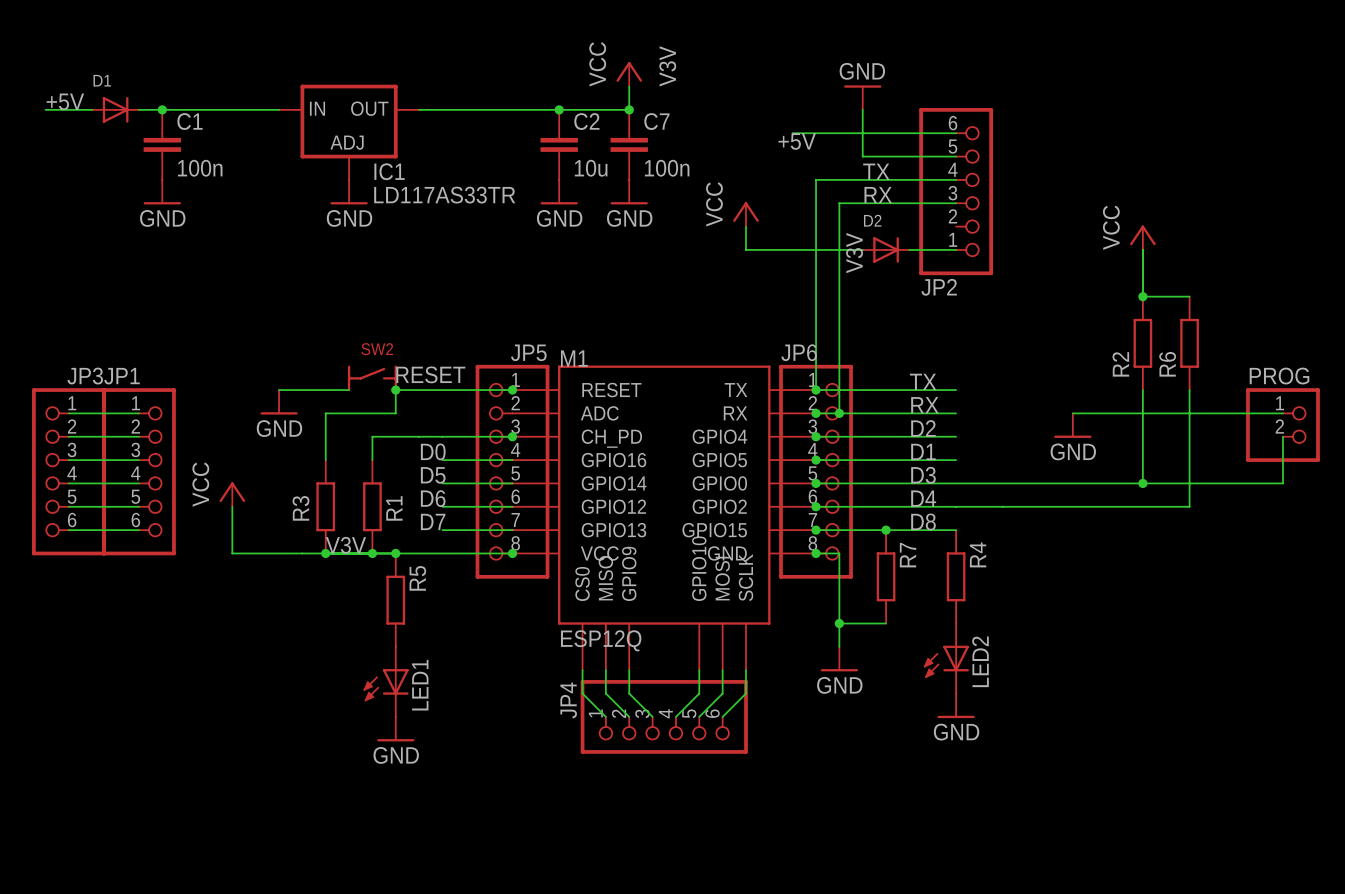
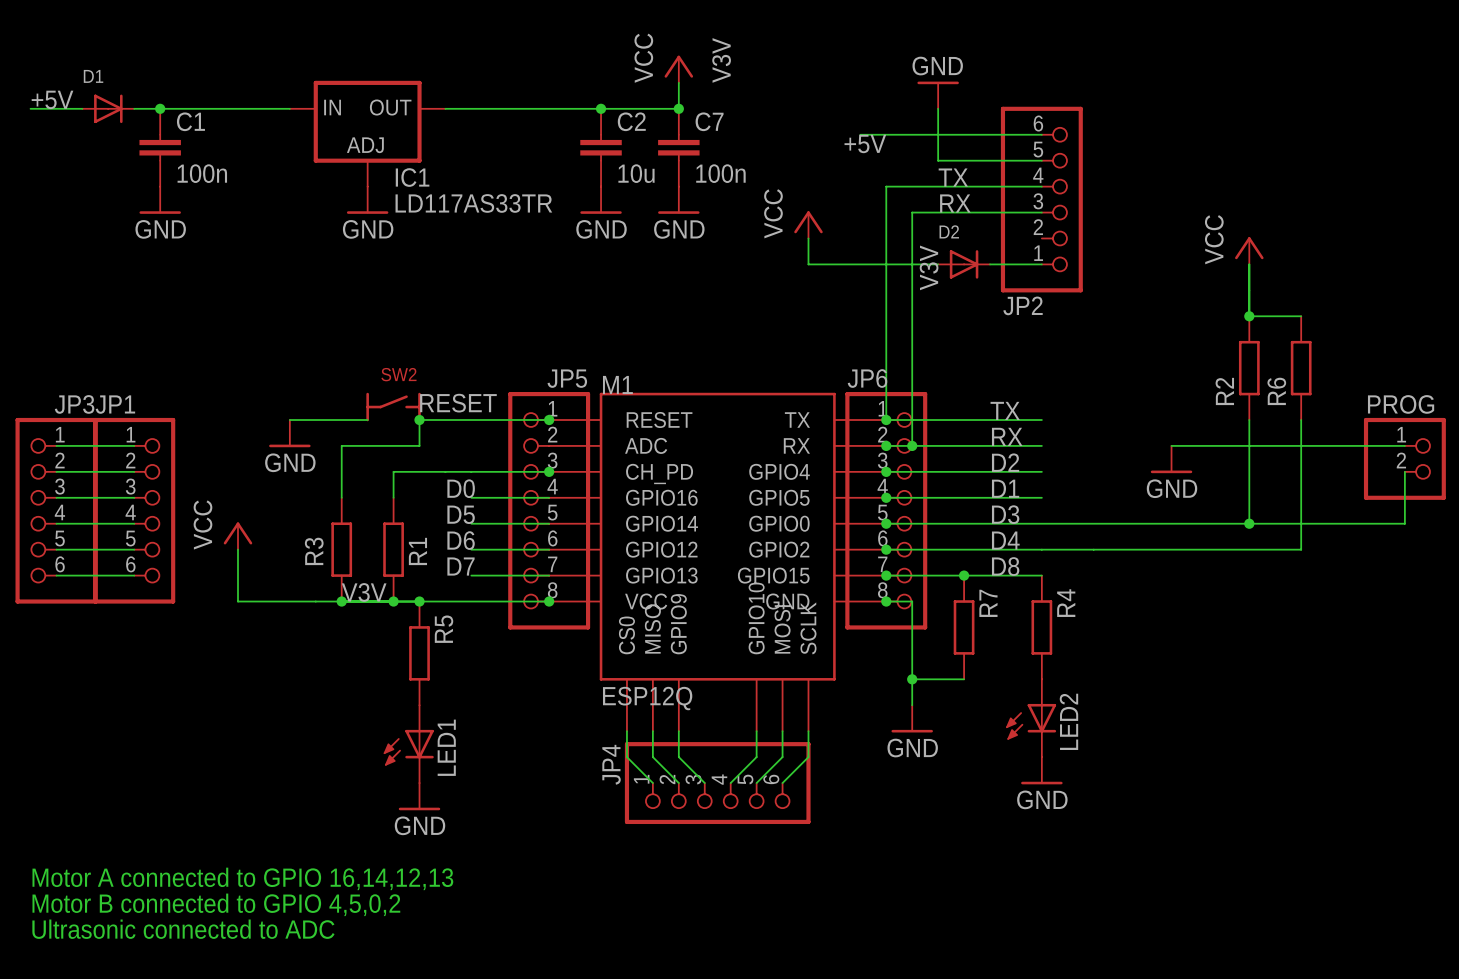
text: none -> Motor A connected to GPIO 16,14,12,13 (242, 878)
text: none -> Motor B connected to GPIO 4,5,0,2 (216, 904)
text: none -> Ultrasonic connected to ADC (183, 929)

